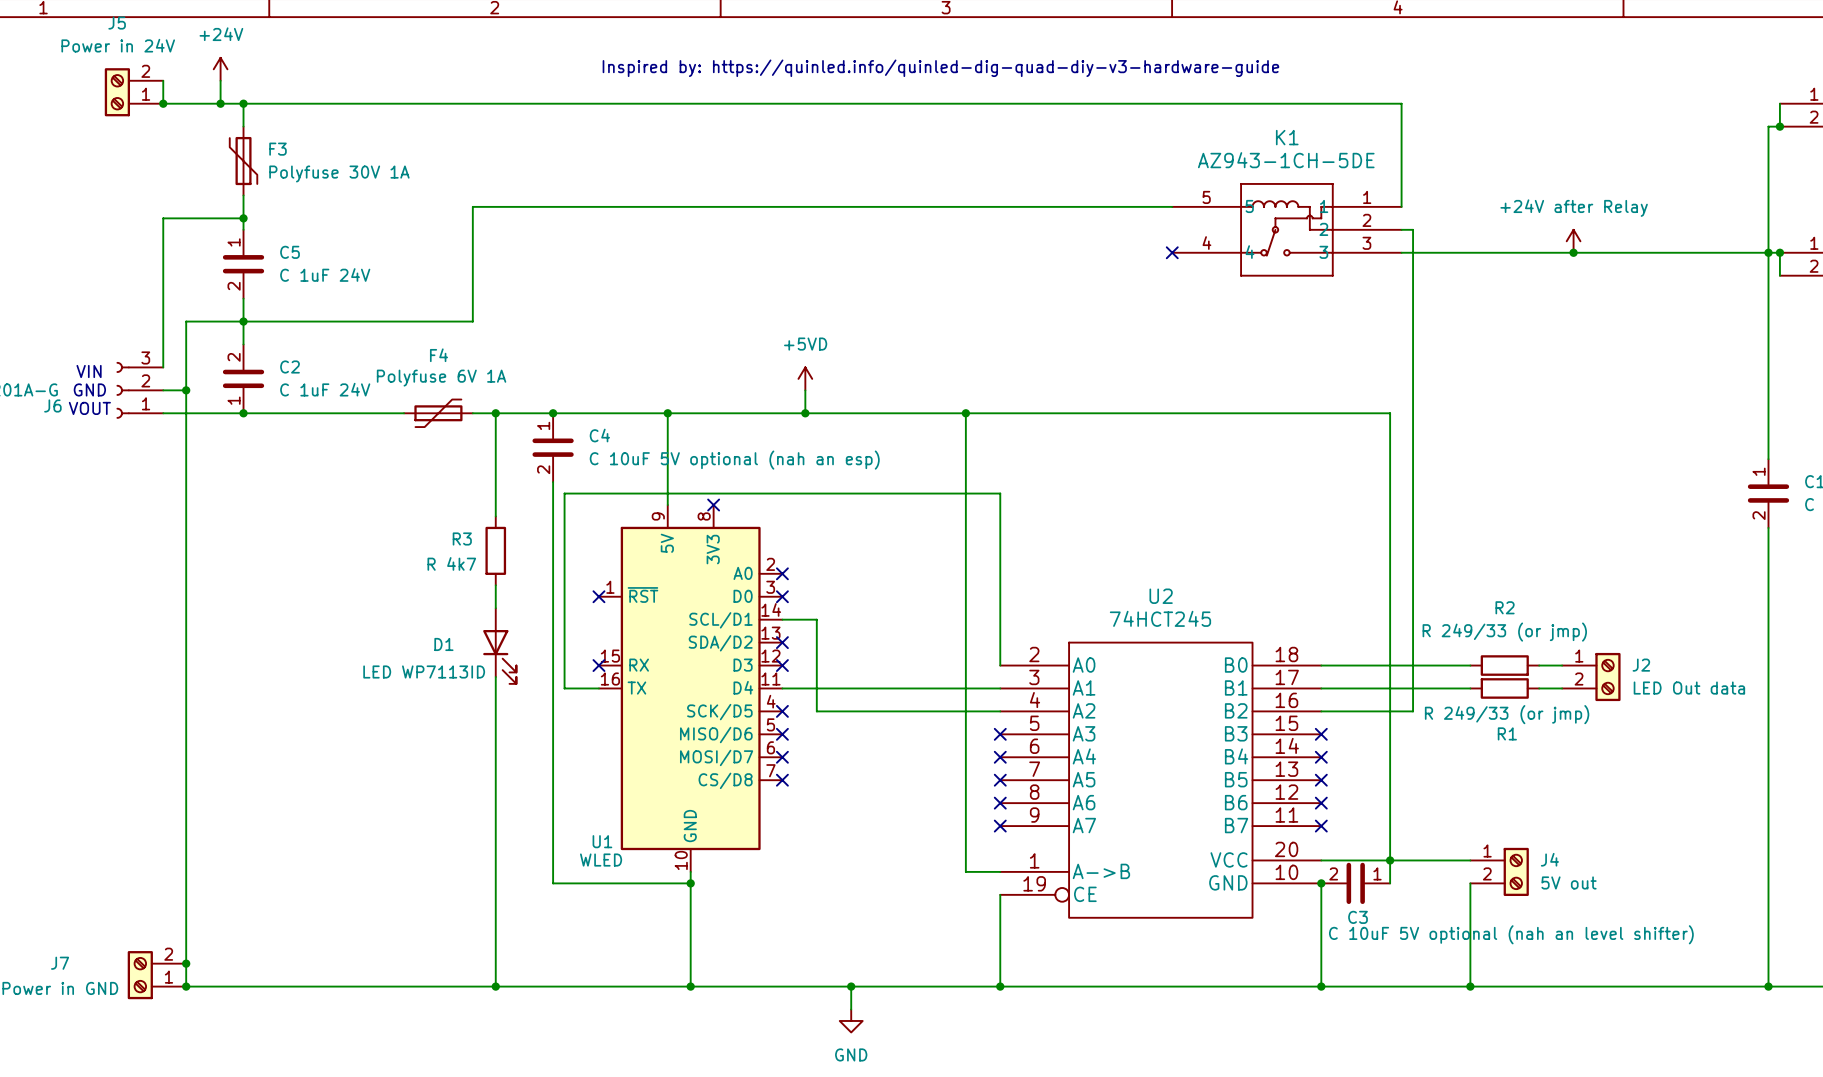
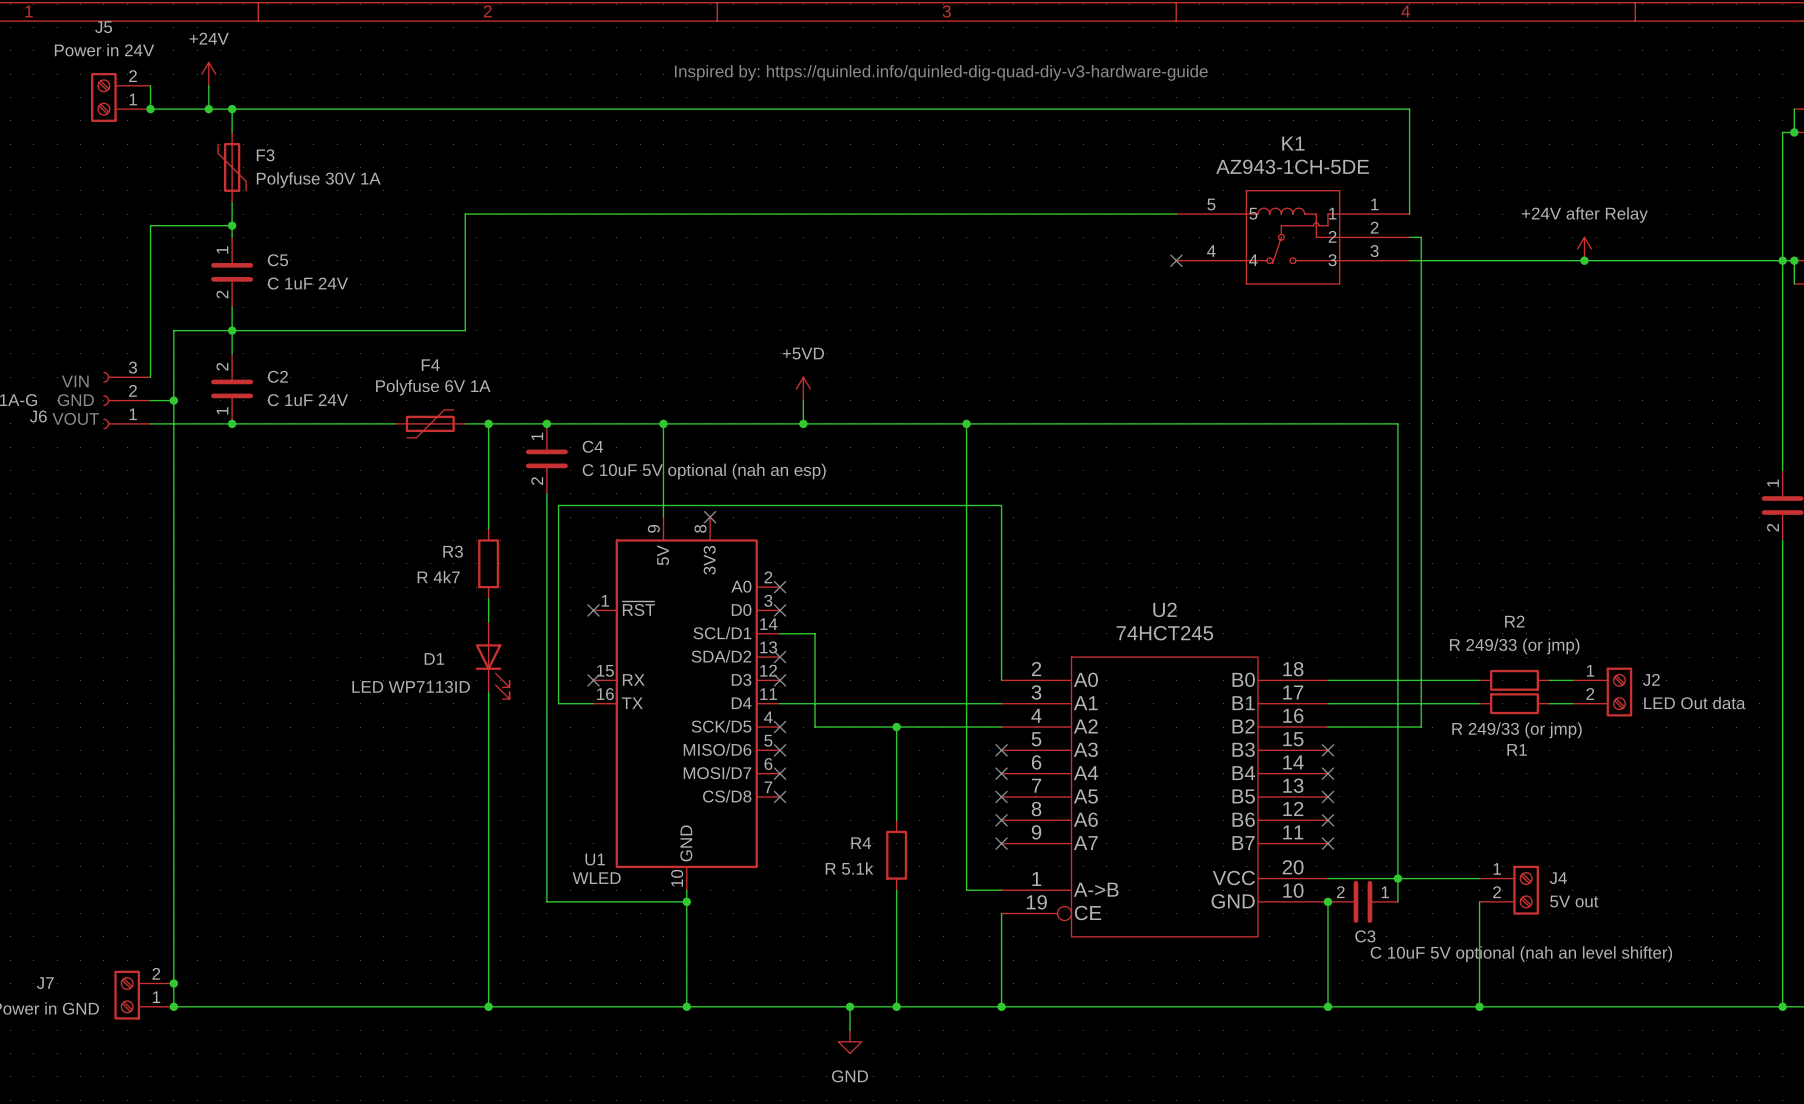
wire: none -> (896, 727) (896, 820)
junction: none -> (896, 727)
R4: none -> R 5.1k (896, 855)
wire: none -> (896, 890) (896, 1006)
junction: none -> (896, 1006)

